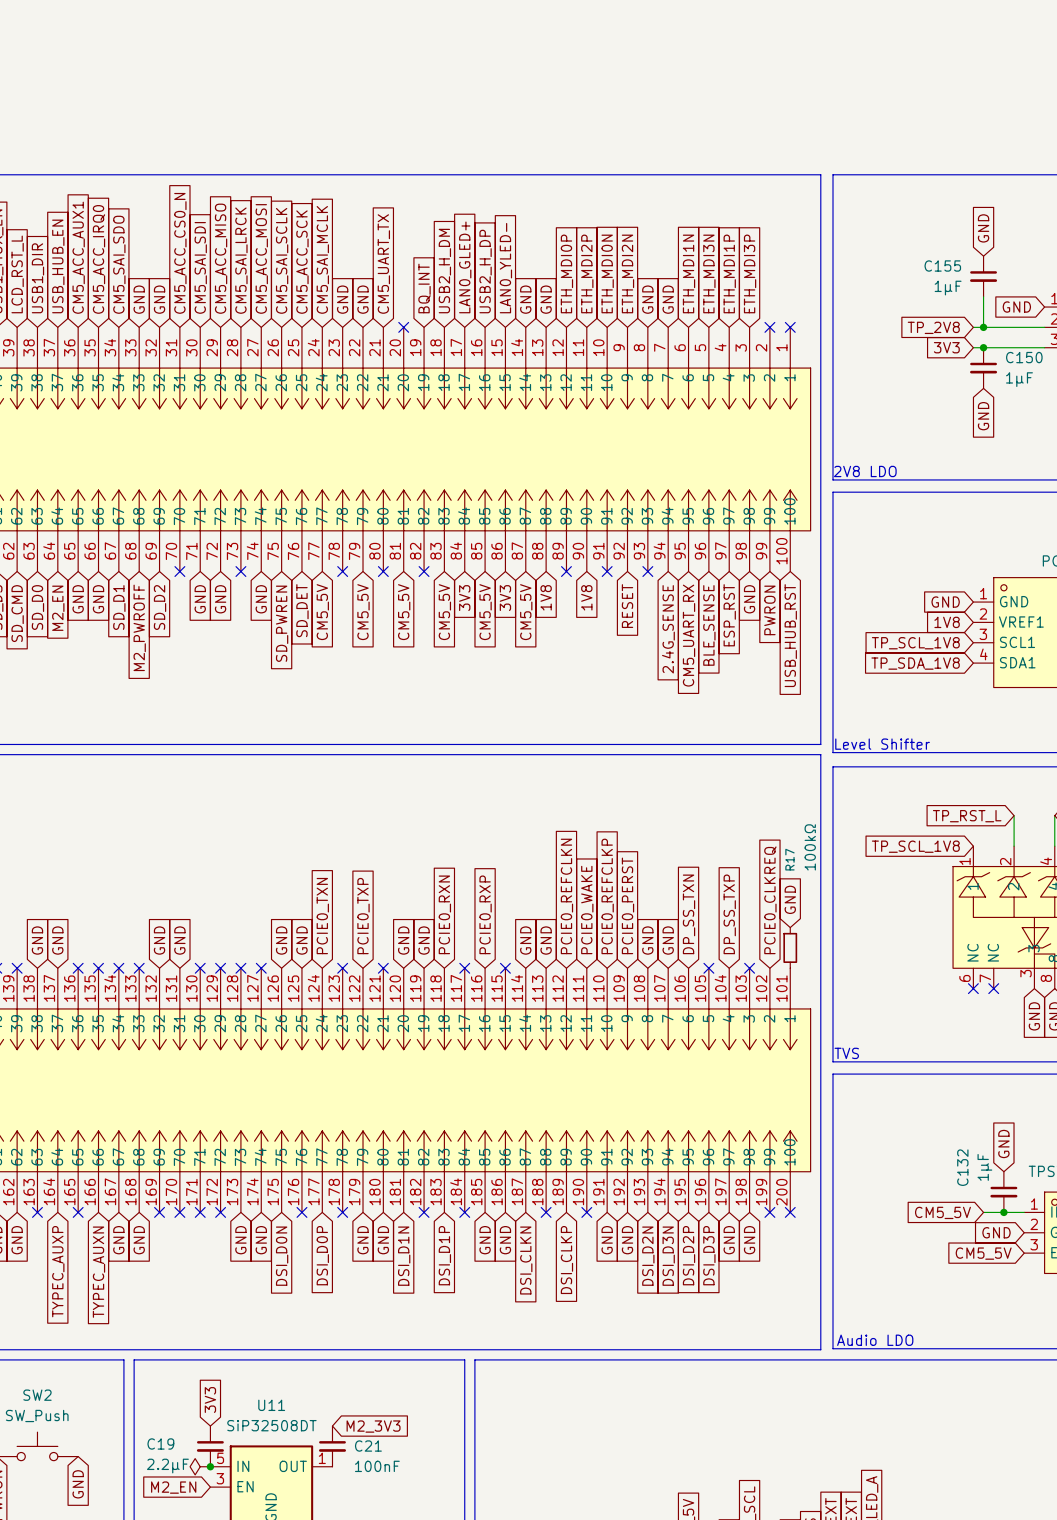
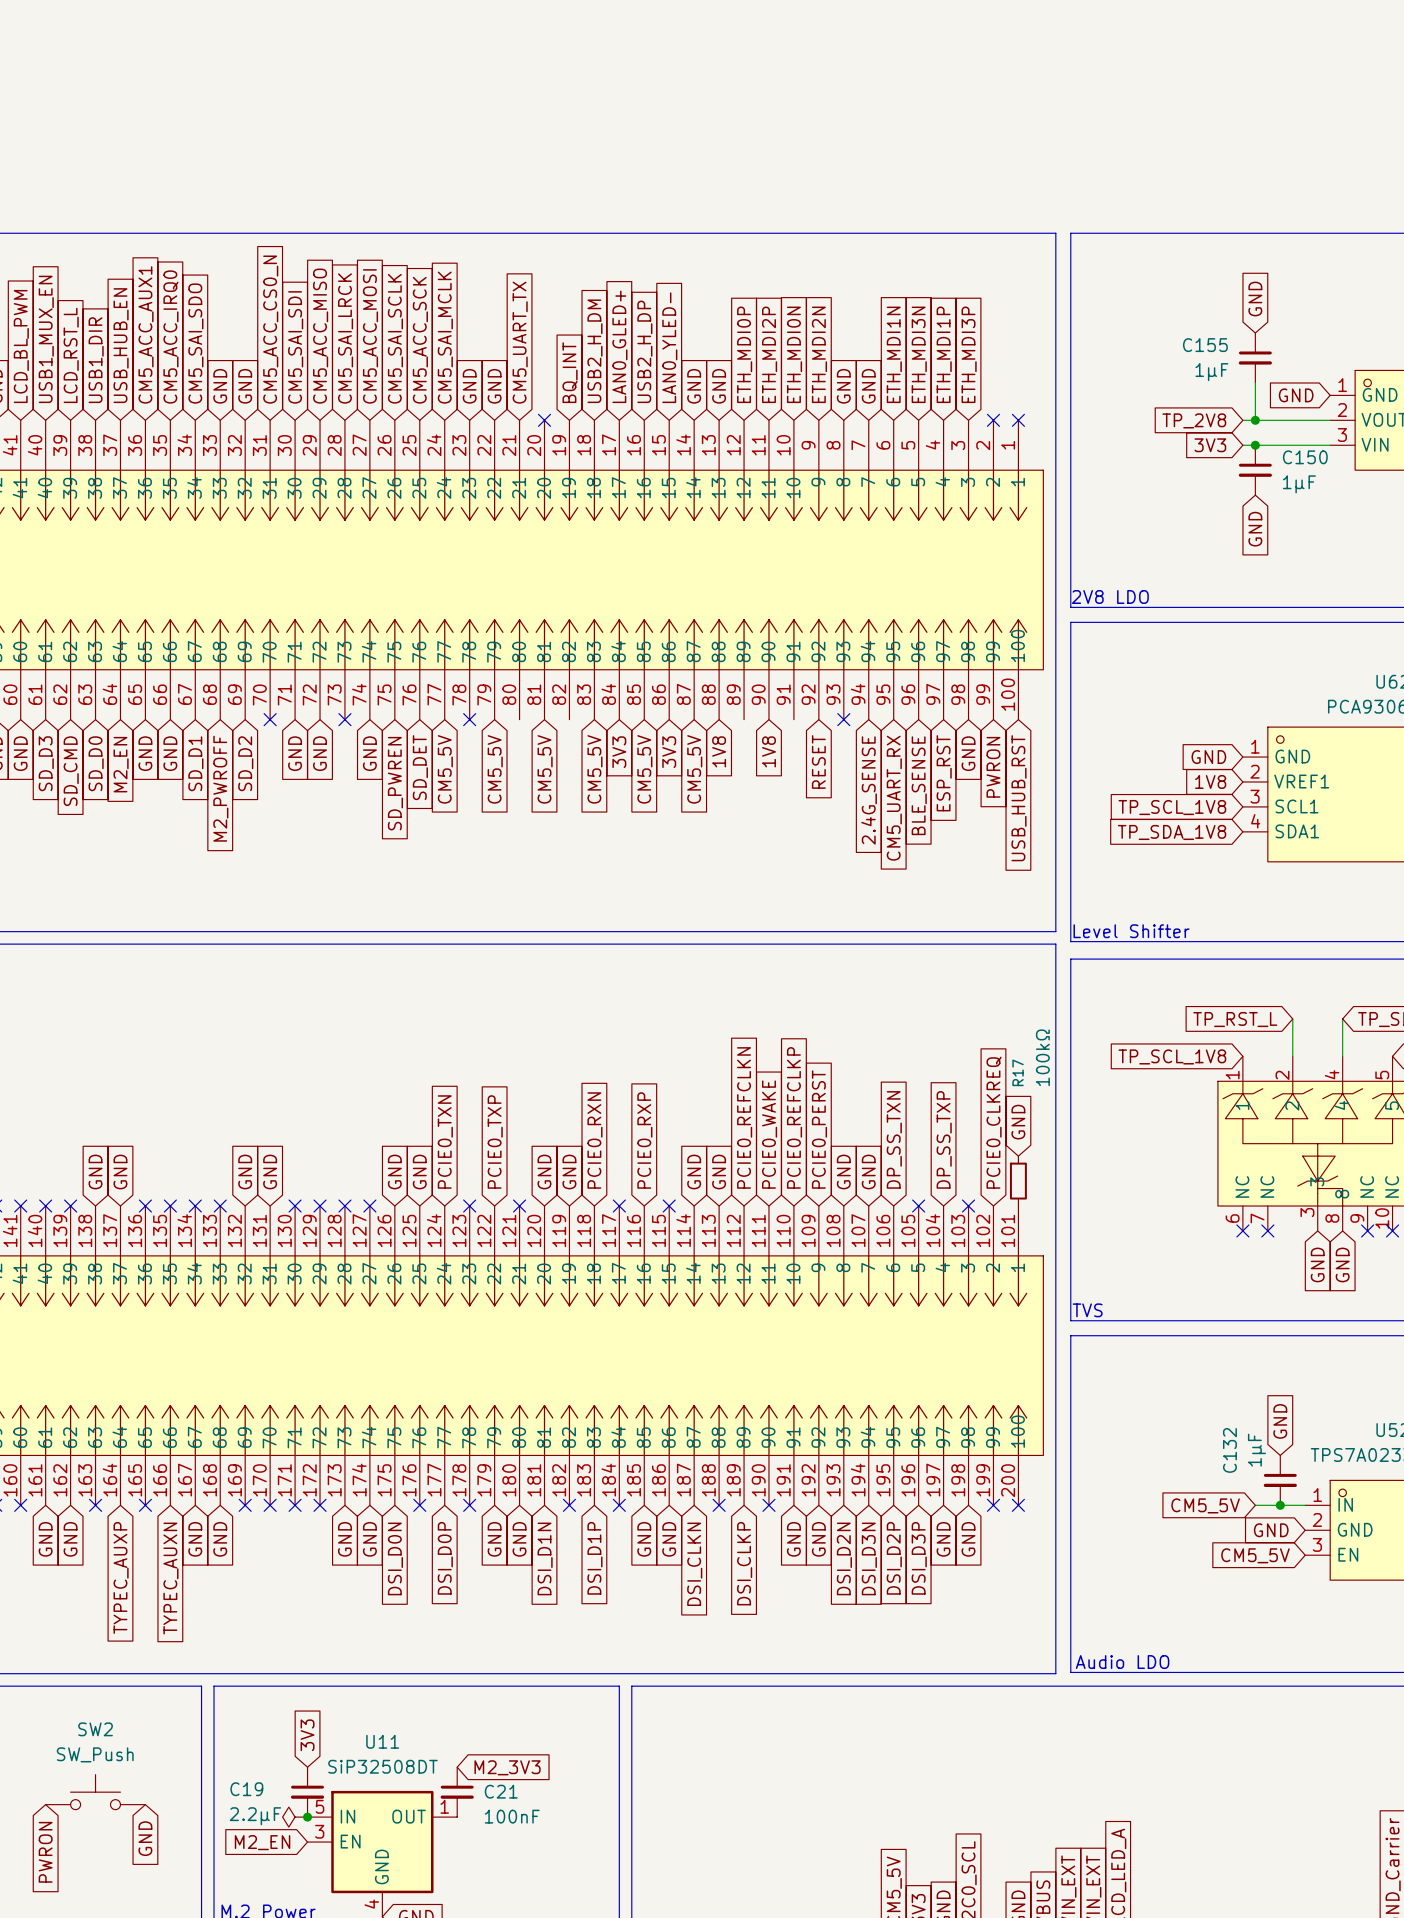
no-connect mark: (383, 571) -> none
no-connect mark: (424, 571) -> none
no-connect mark: (566, 571) -> none
no-connect mark: (607, 571) -> none

